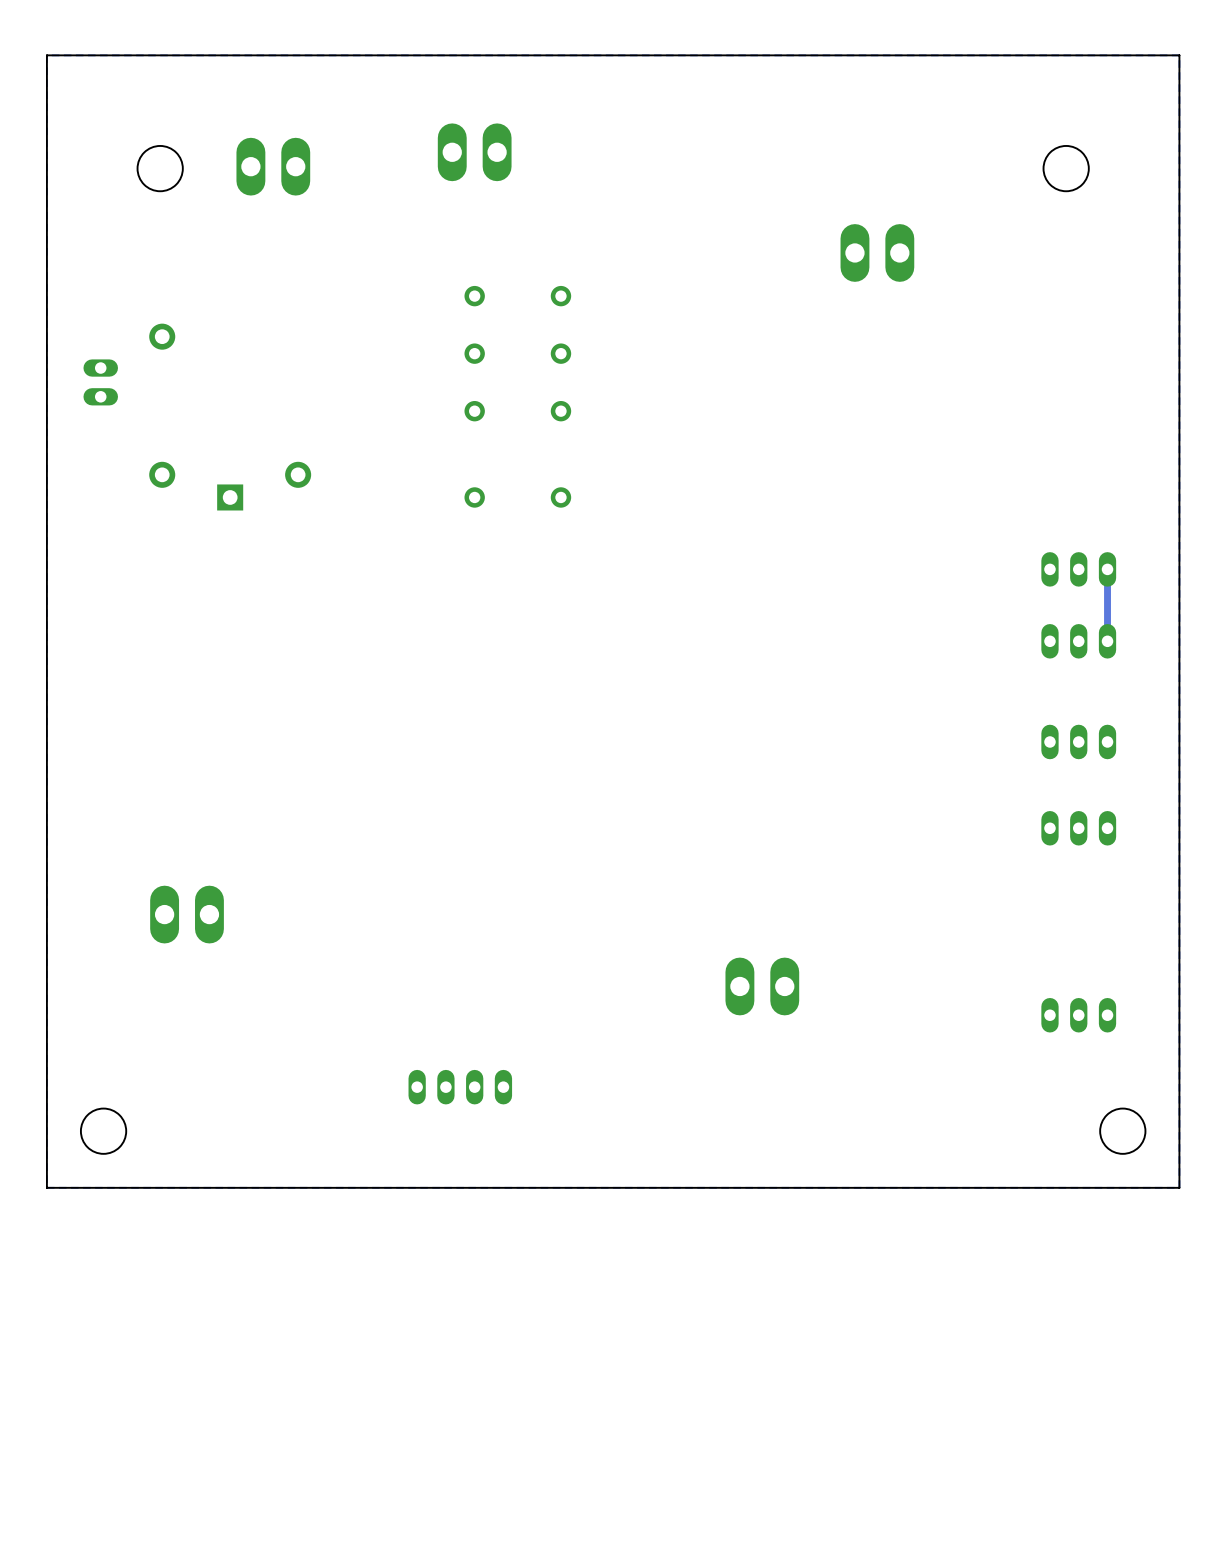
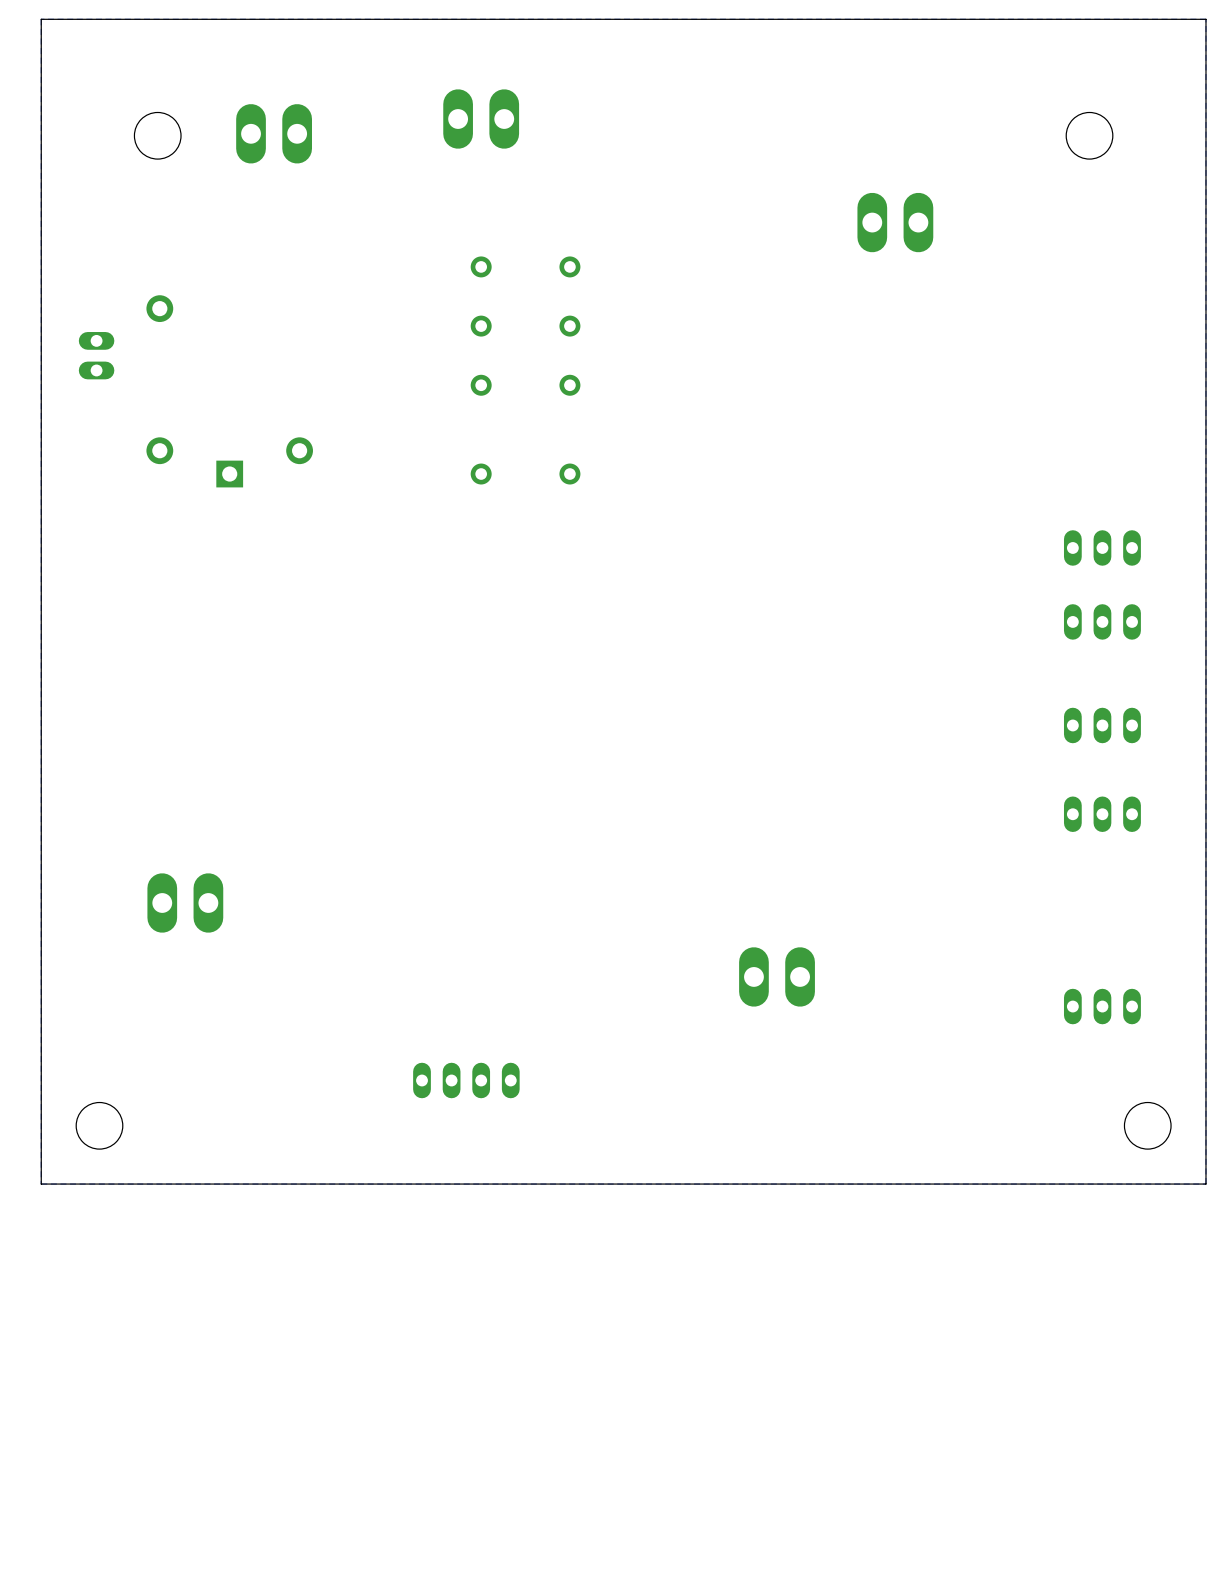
track: (1107, 569) (1107, 641) -> none

